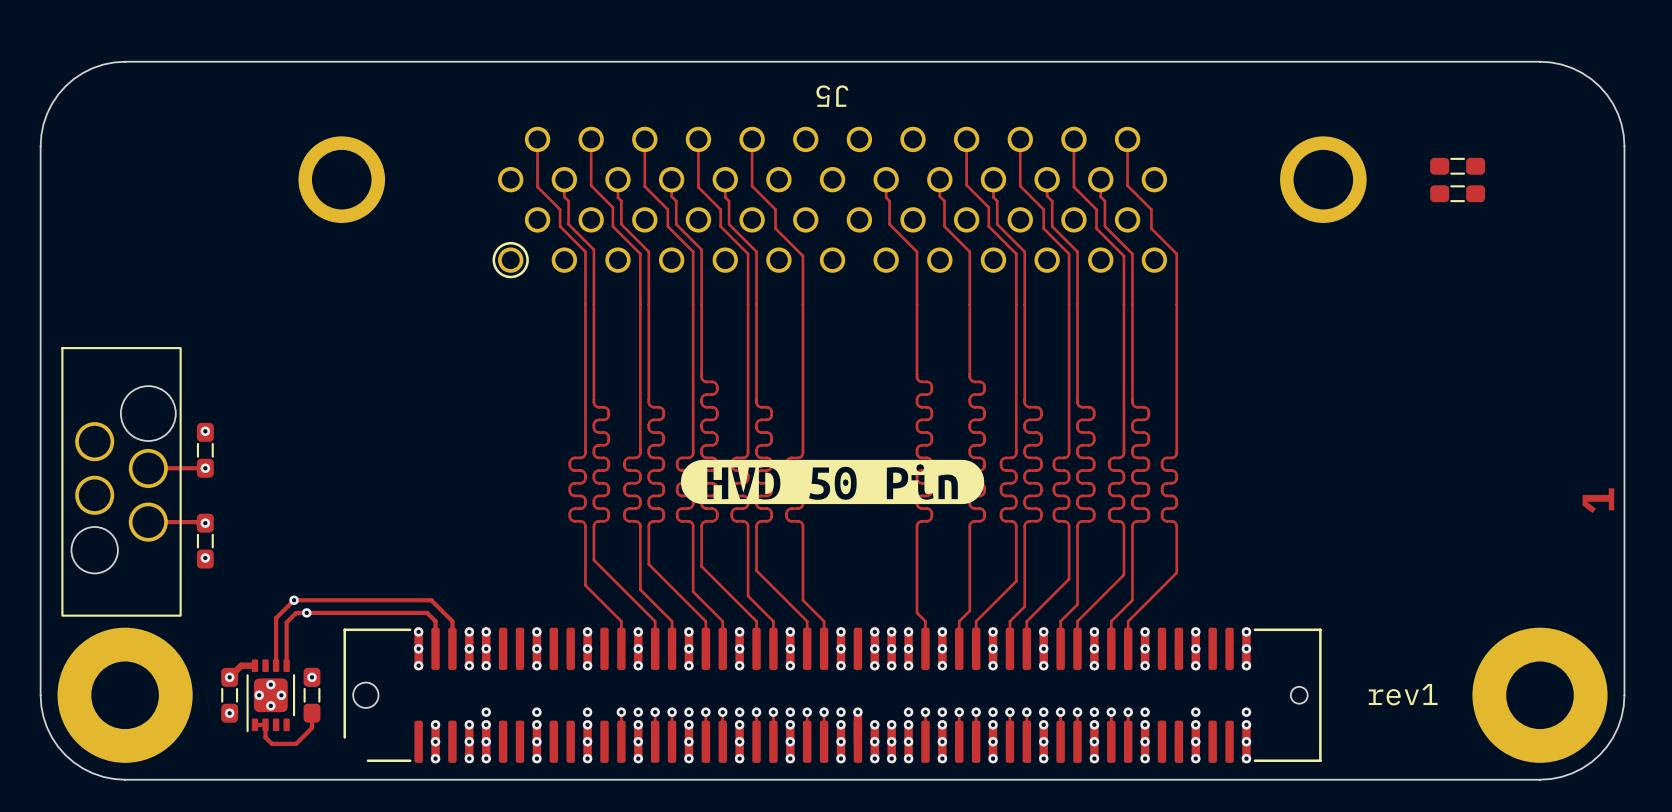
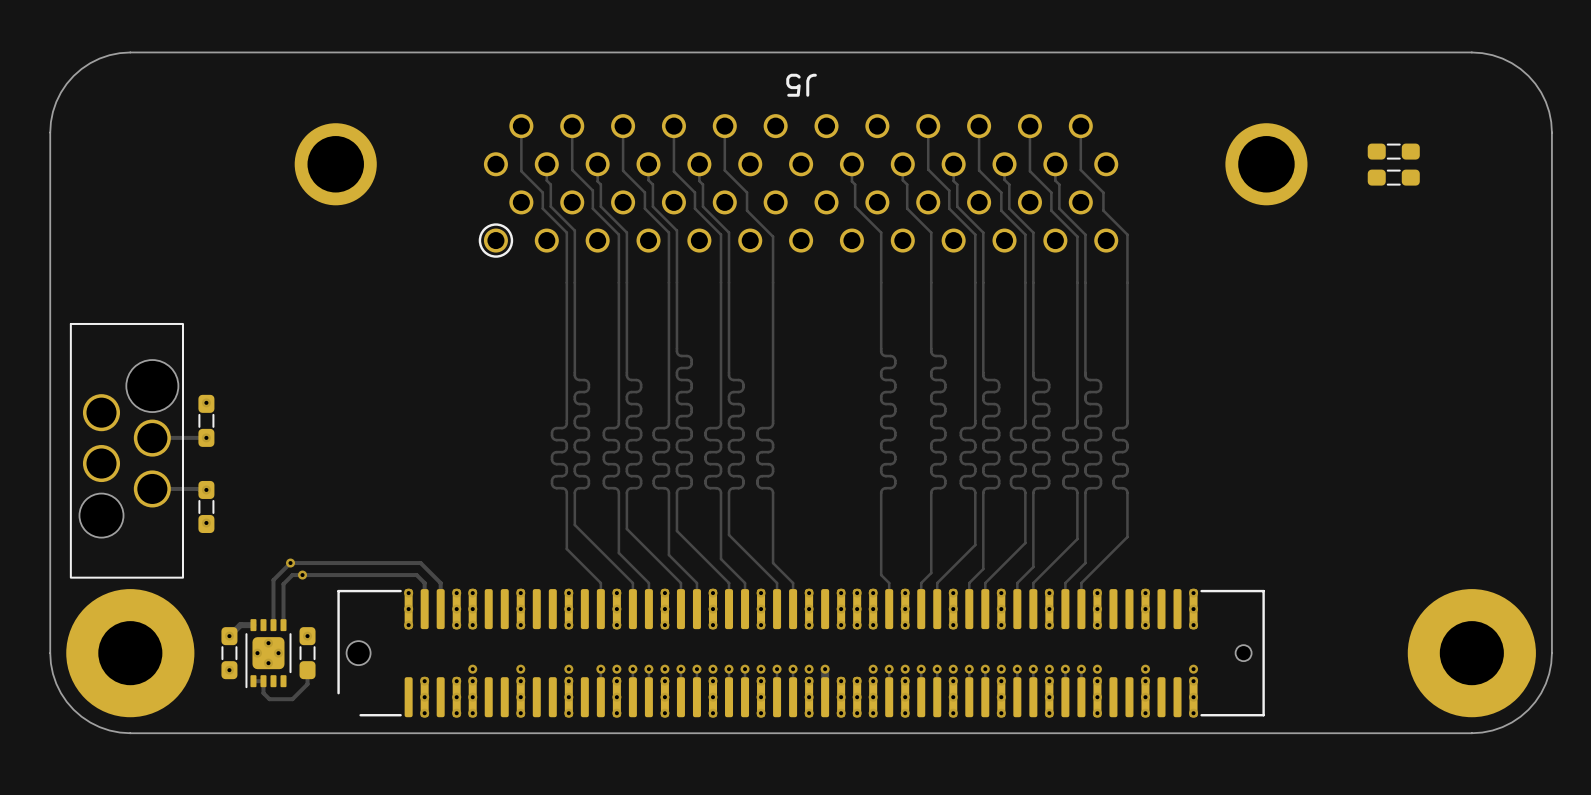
drawing: [680, 459, 985, 505] -> none
text: 1 (1598, 500) -> none
text: rev1 (1403, 694) -> none

